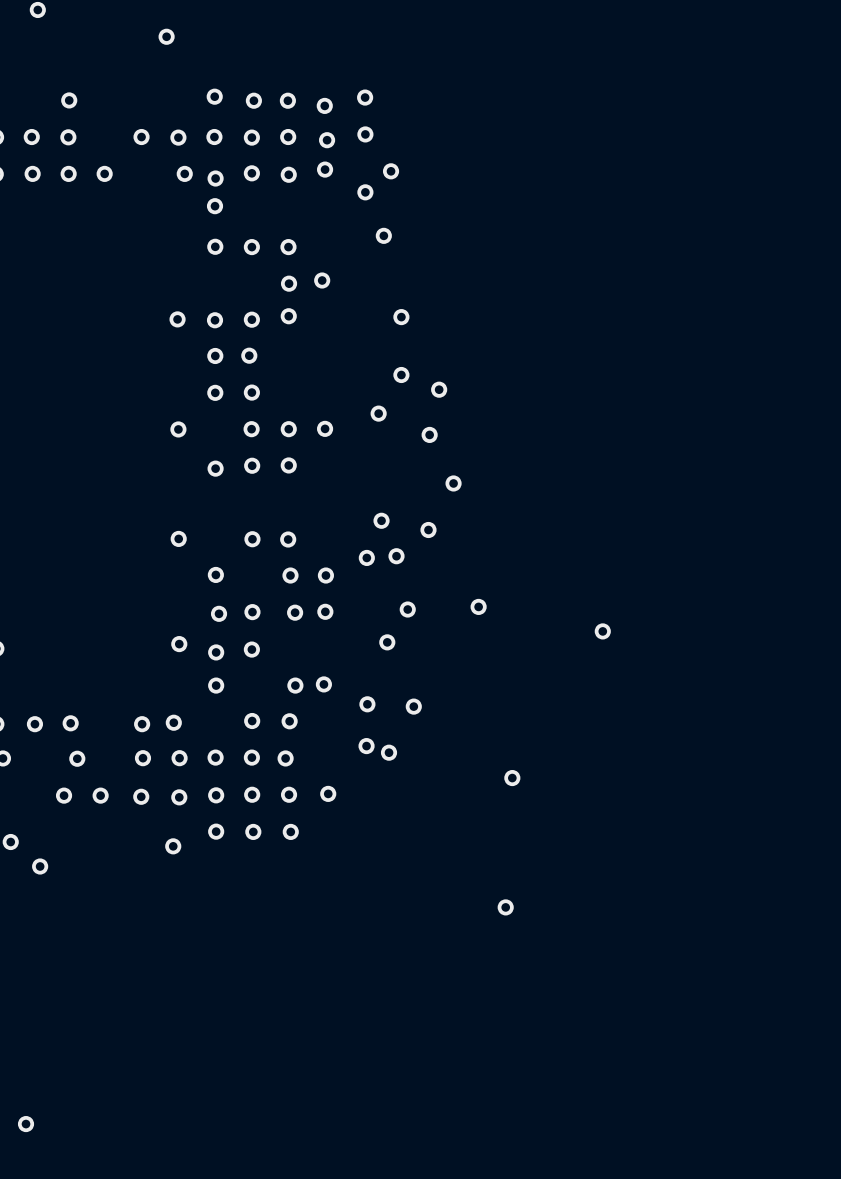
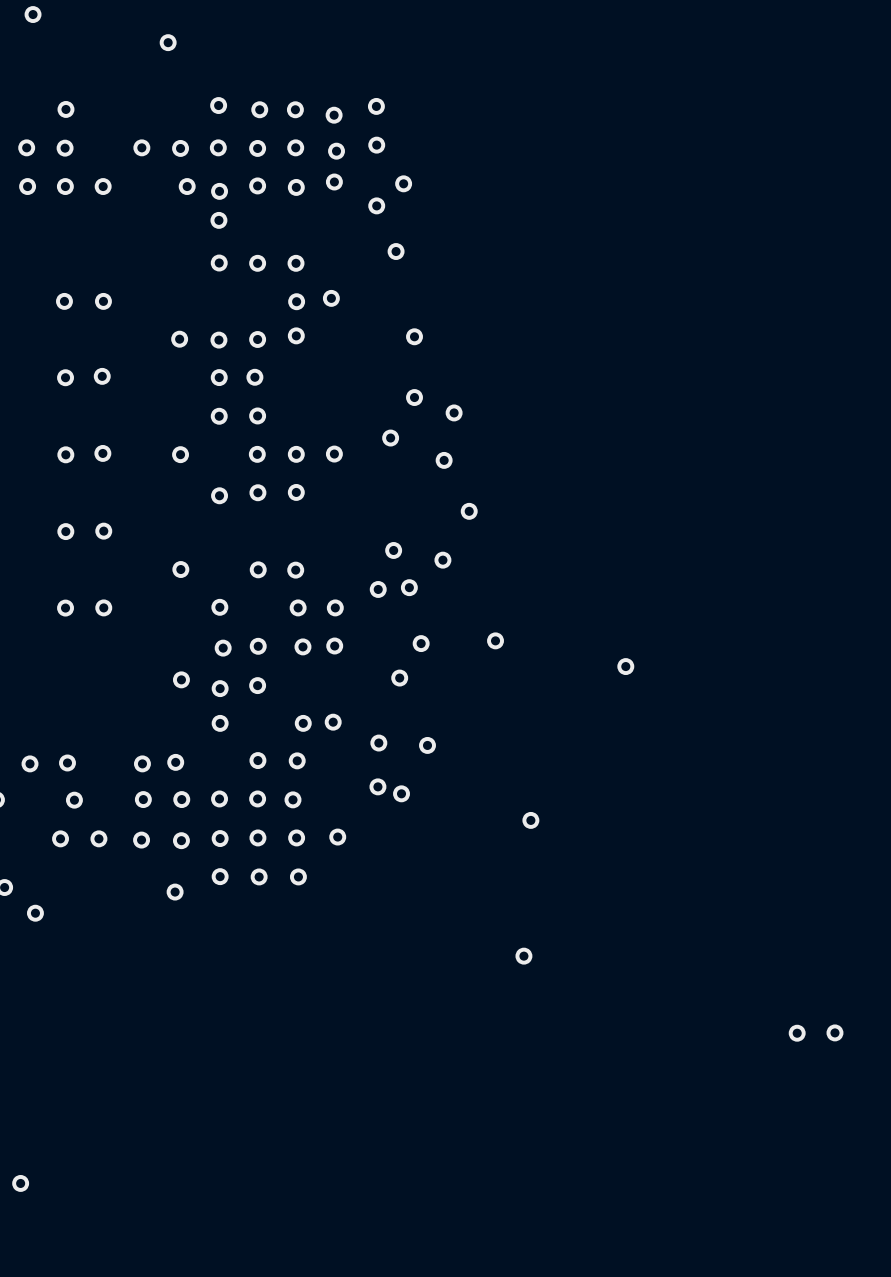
via: none -> (64, 301)
via: none -> (103, 301)
via: none -> (102, 376)
via: none -> (65, 377)
via: none -> (102, 453)
via: none -> (65, 454)
via: none -> (65, 531)
via: none -> (103, 531)
via: none -> (65, 608)
via: none -> (103, 607)
via: none -> (797, 1033)
via: none -> (834, 1032)

